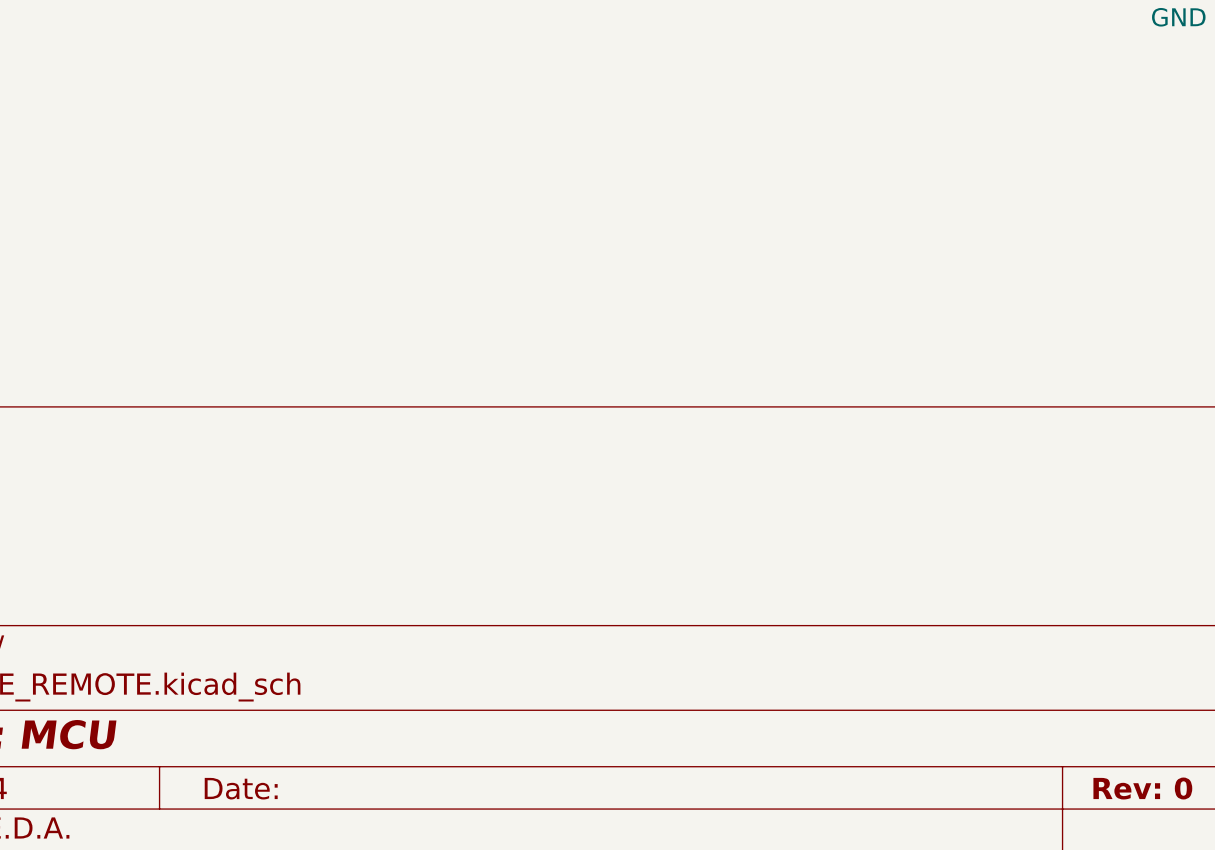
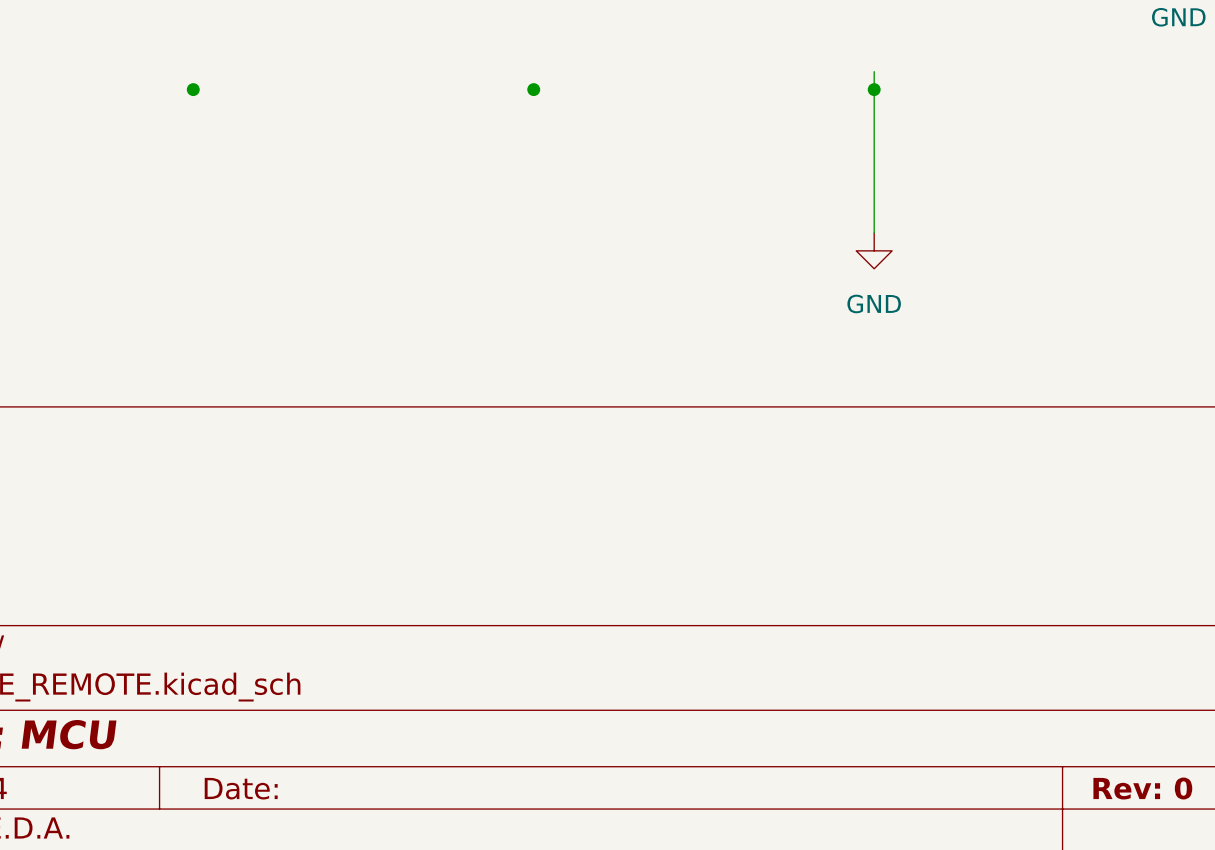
wire: none -> (874, 71) (874, 232)
junction: none -> (193, 89)
junction: none -> (533, 89)
junction: none -> (874, 89)
power symbol: none -> GND (874, 250)

